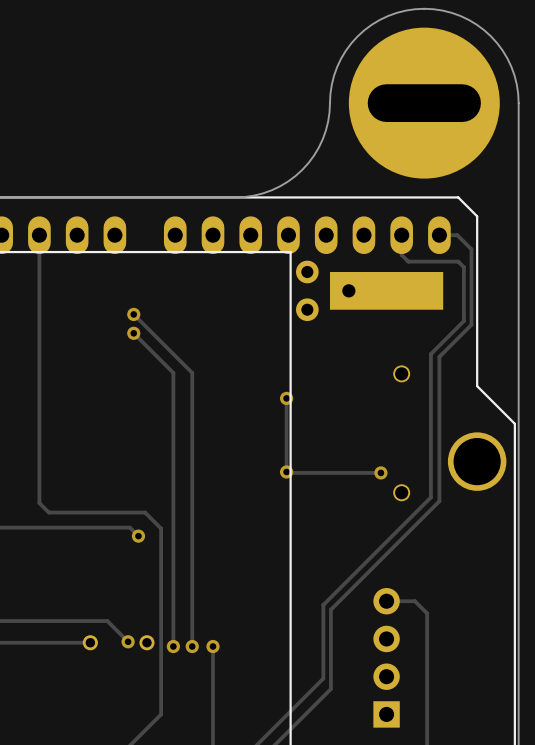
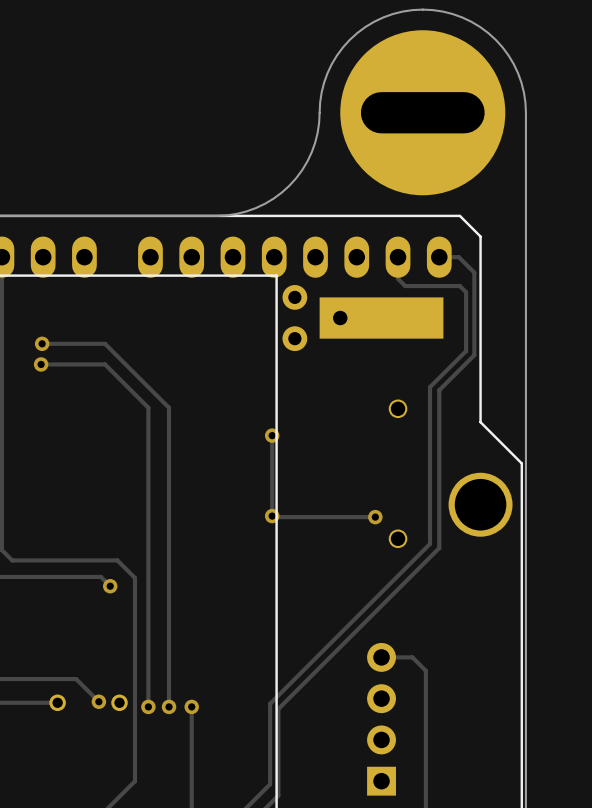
track: none -> (42, 343) (105, 343)
via: none -> (42, 343)
via: (133, 314) -> none
track: none -> (41, 364) (105, 364)
via: none -> (41, 364)
via: (133, 333) -> none
track: (323, 605) (323, 678) (284, 717) -> (312, 661) (270, 703) (270, 784)
track: (330, 609) (330, 688) (292, 727) -> (320, 666) (278, 708) (278, 795)

